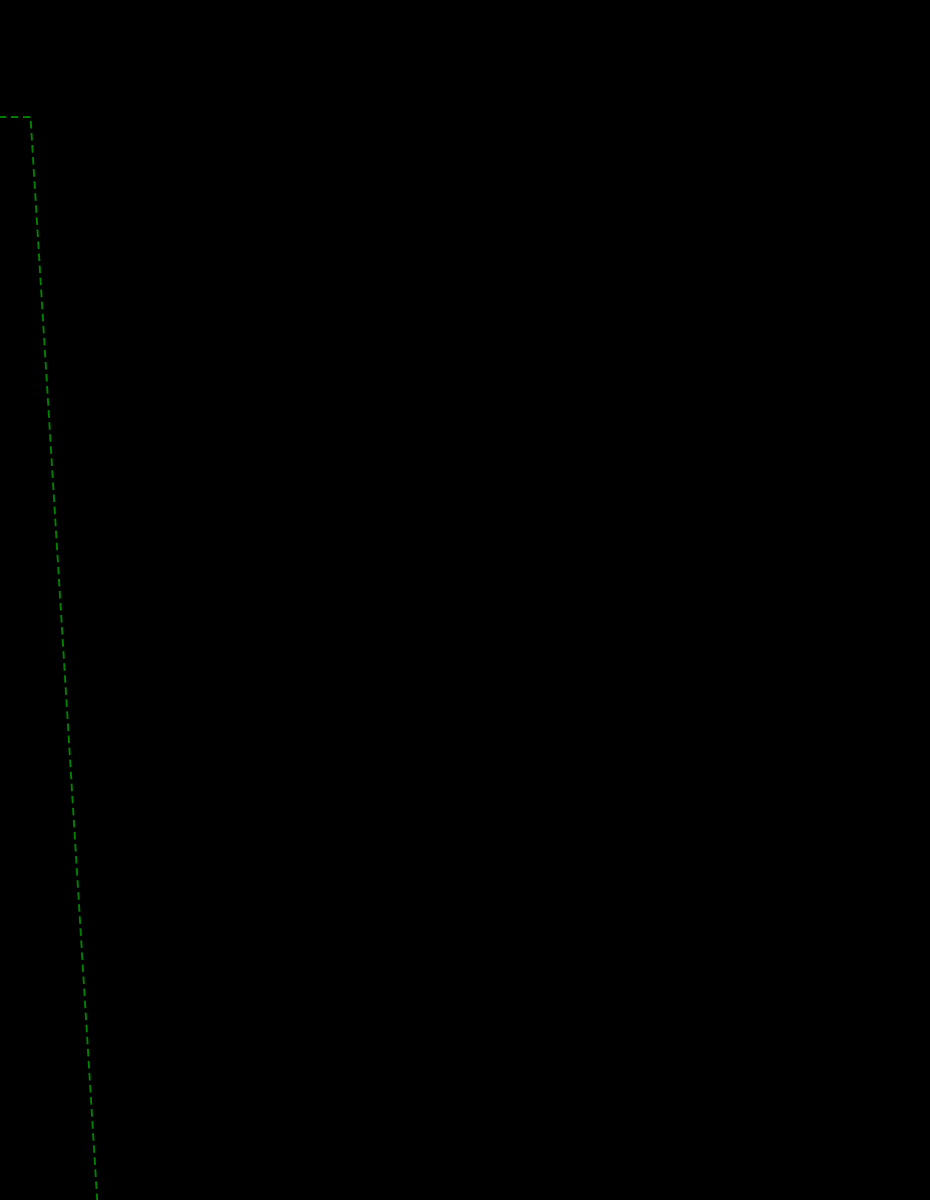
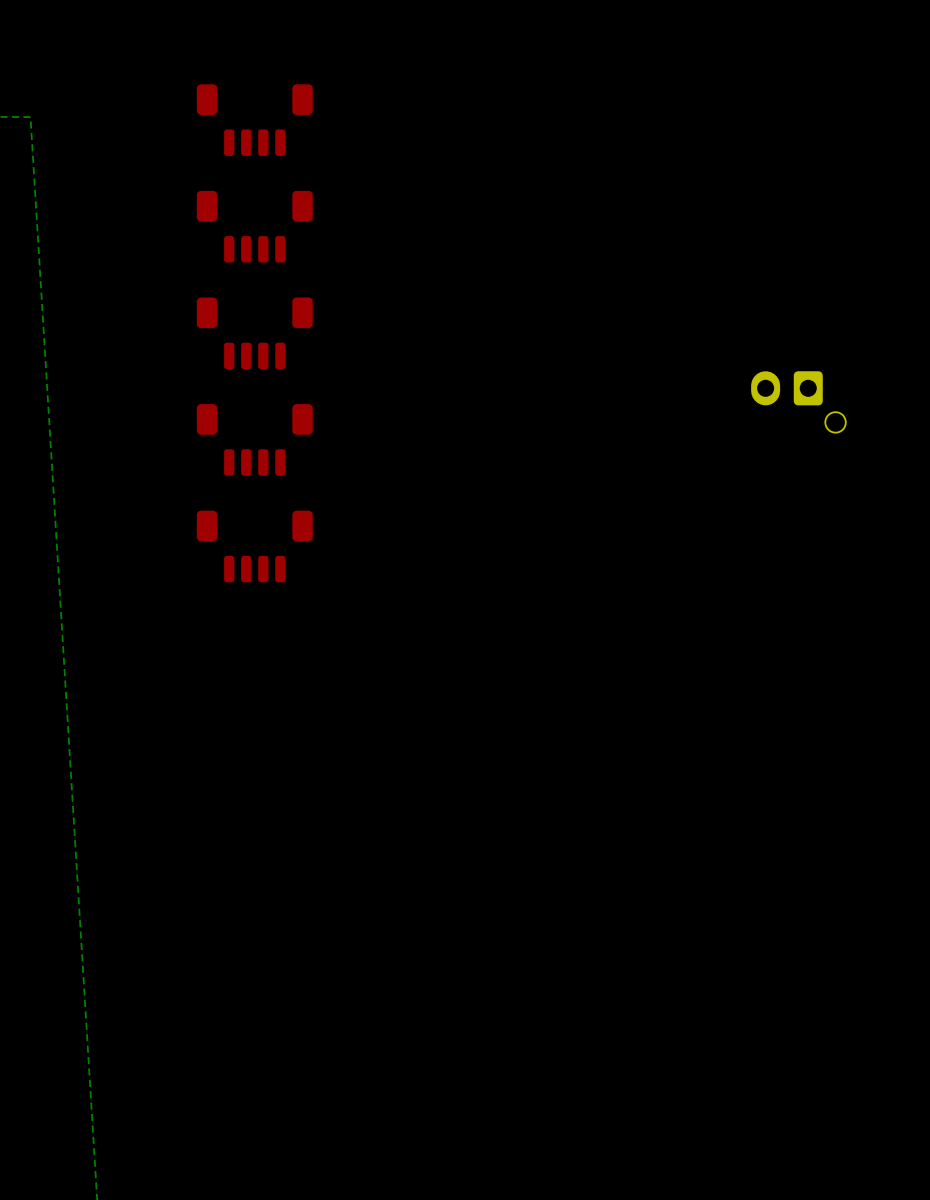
part: none -> (254, 120)
part: none -> (254, 226)
part: none -> (254, 333)
part: none -> (798, 401)
part: none -> (254, 439)
part: none -> (254, 546)

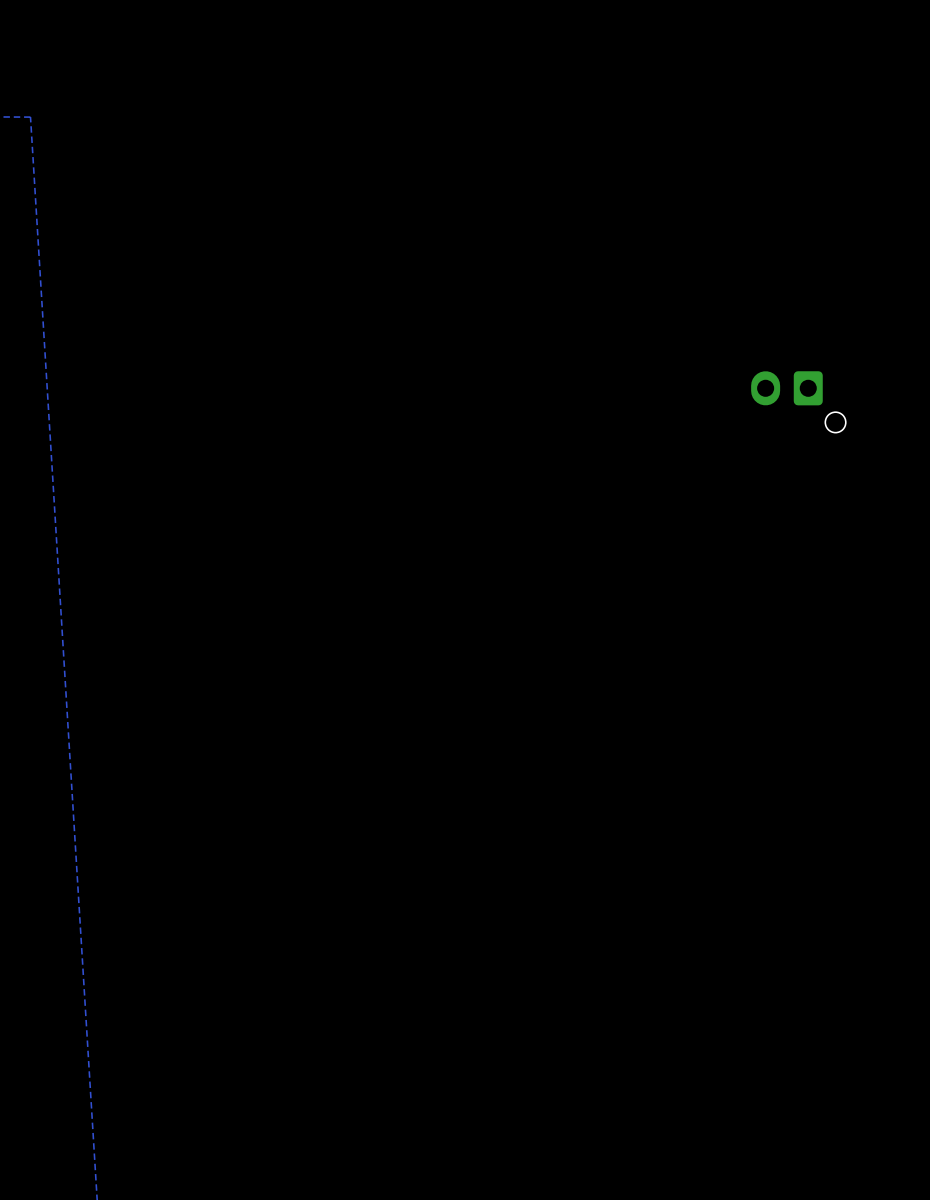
part: (254, 120) -> none
part: (254, 226) -> none
part: (254, 333) -> none
part: (254, 439) -> none
part: (254, 546) -> none

